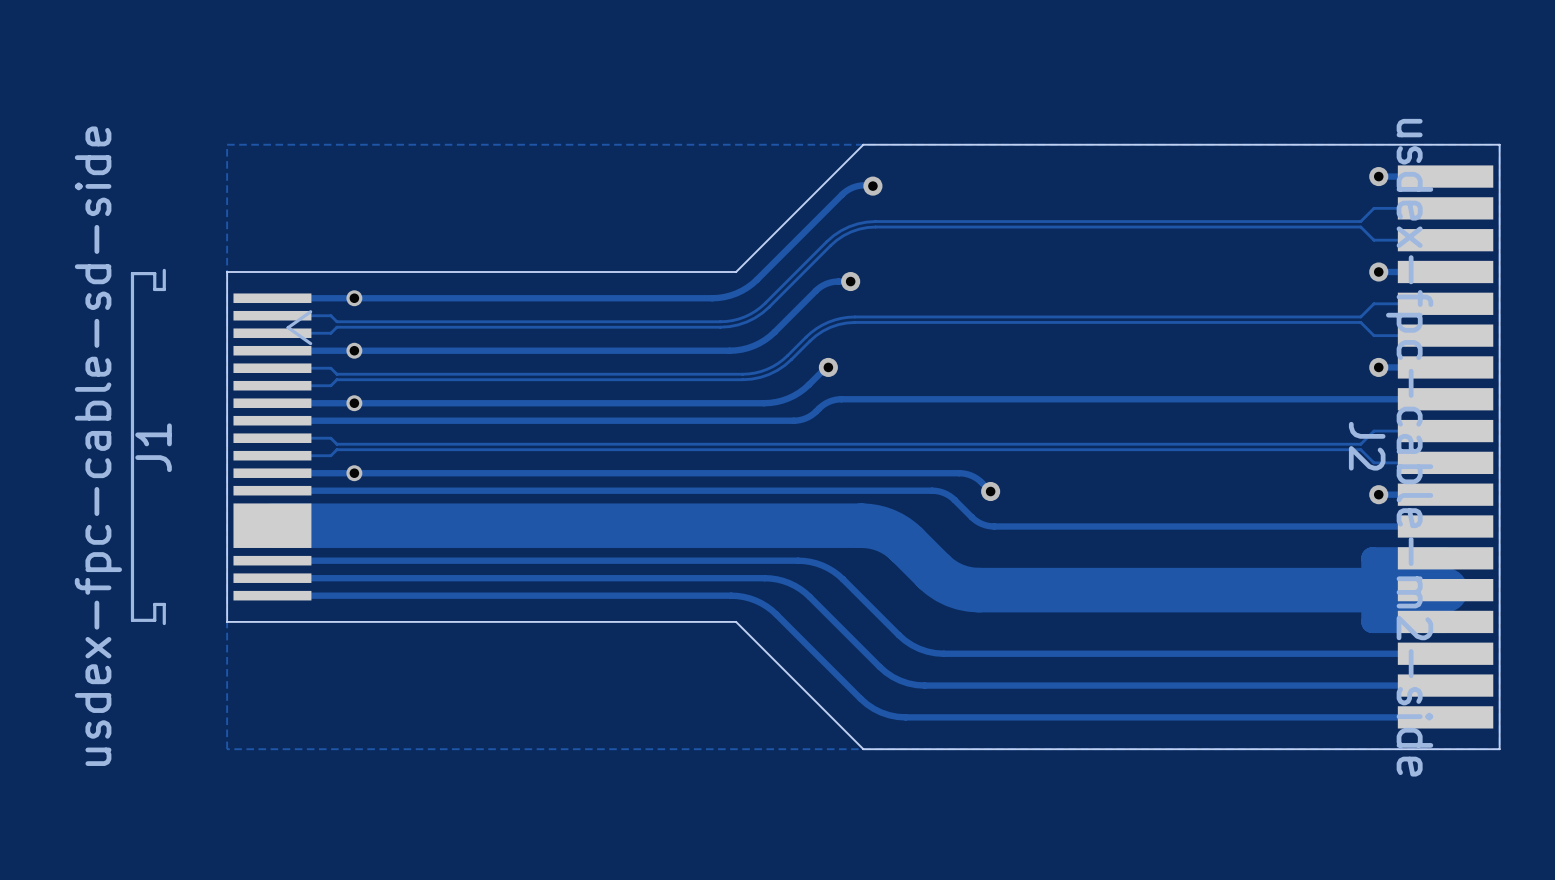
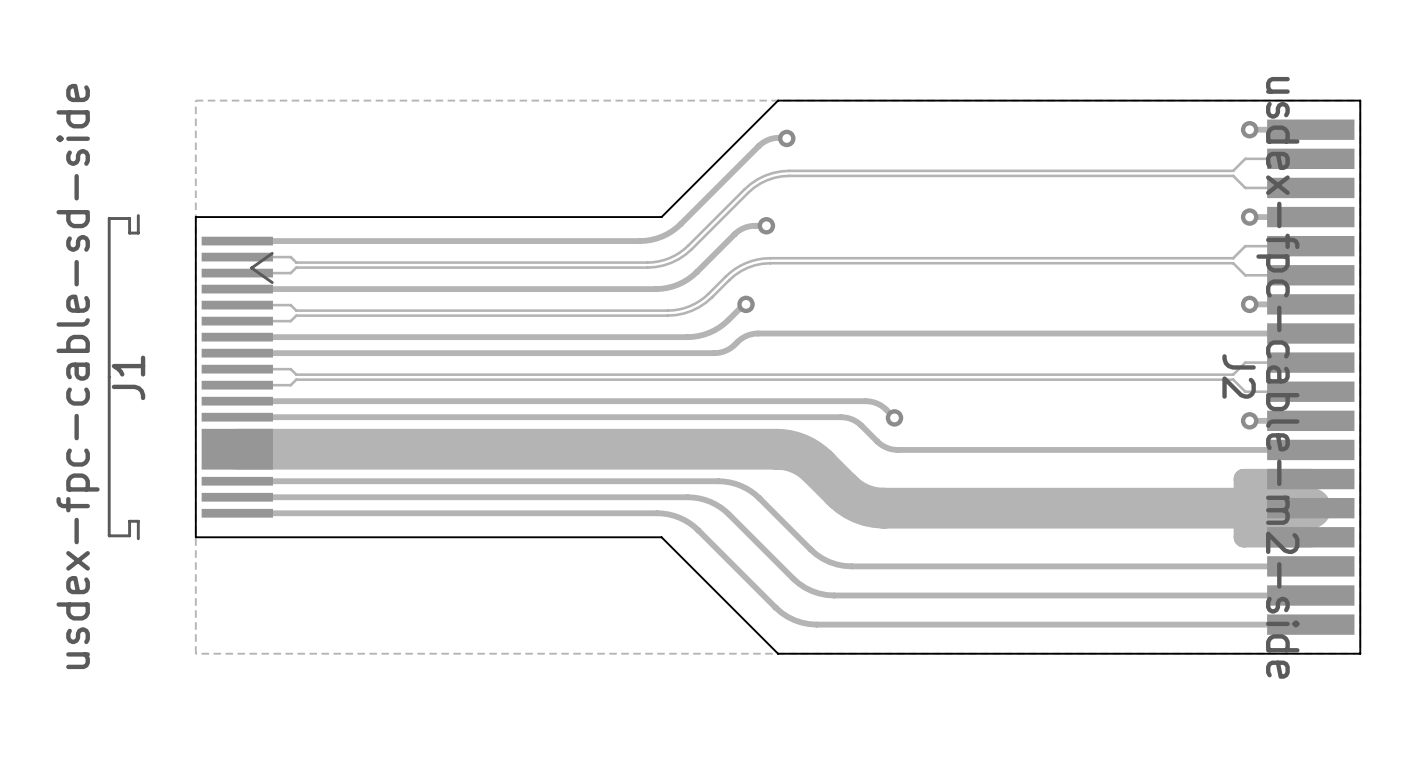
via: (354, 298) -> none
via: (354, 350) -> none
via: (354, 403) -> none
via: (354, 473) -> none

